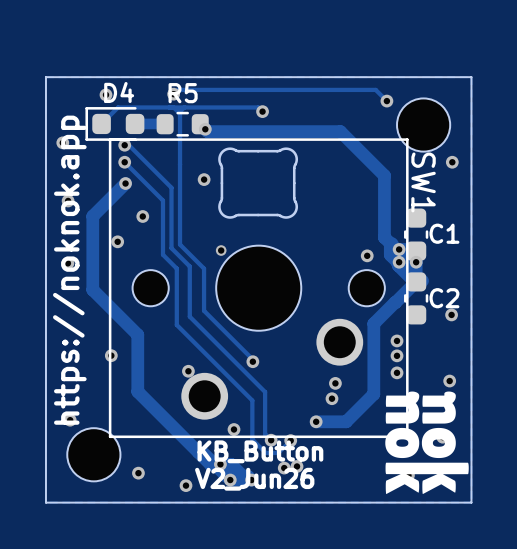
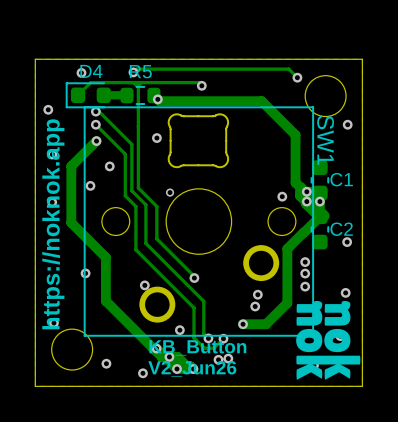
via: none -> (156, 348)

